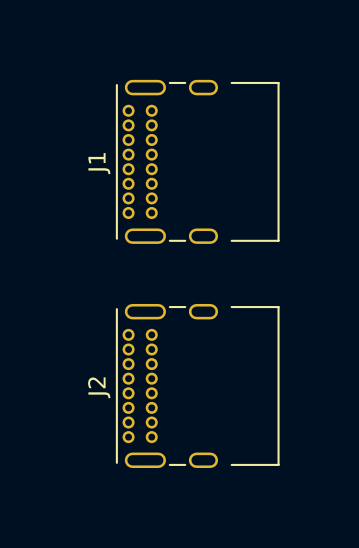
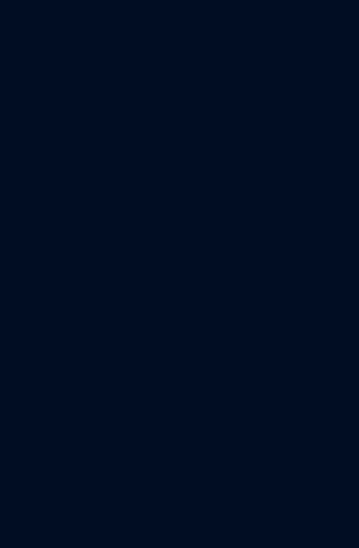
J1: (197, 161) -> none
J2: (197, 385) -> none

